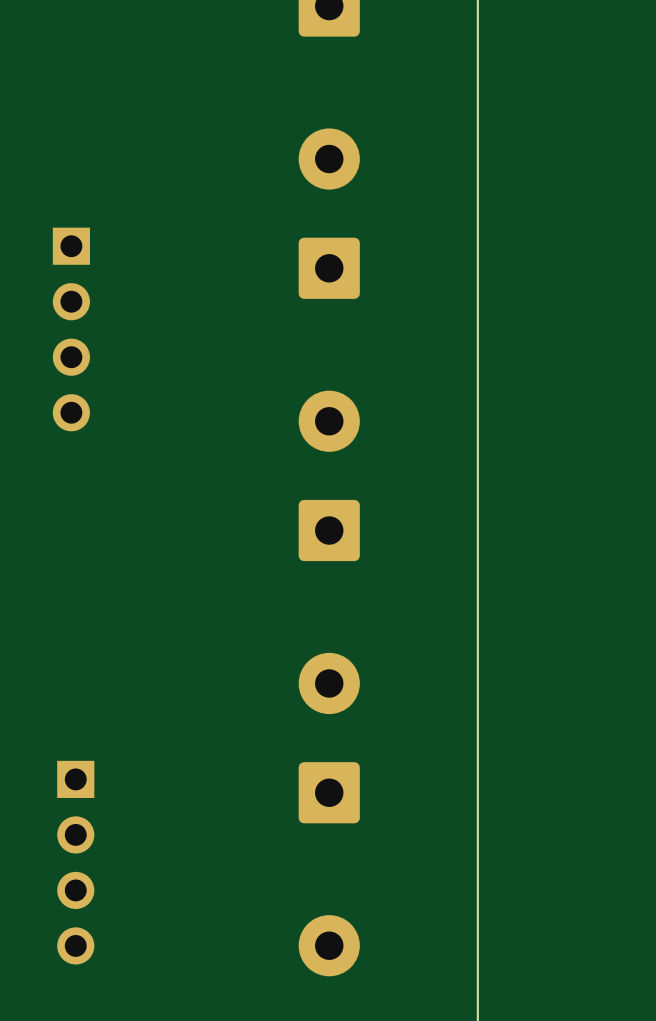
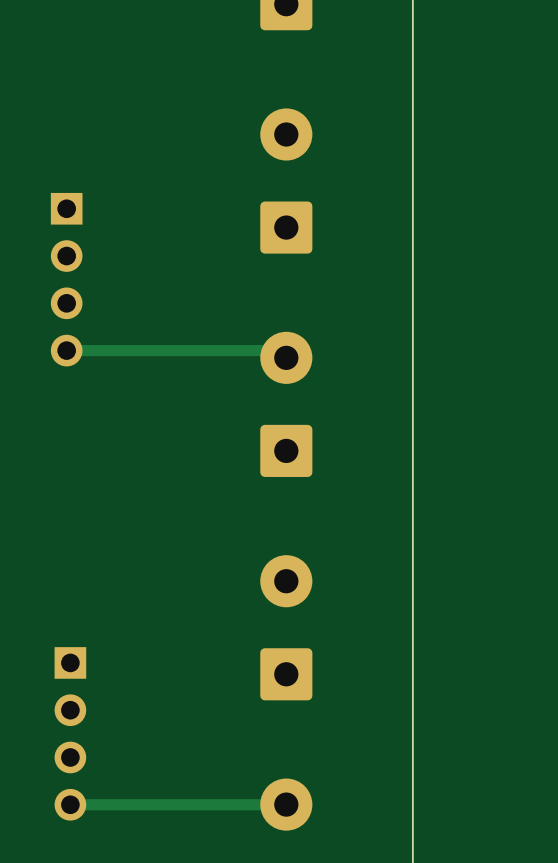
track: none -> (66, 350) (279, 350) (286, 357)
track: none -> (286, 804) (70, 804)

